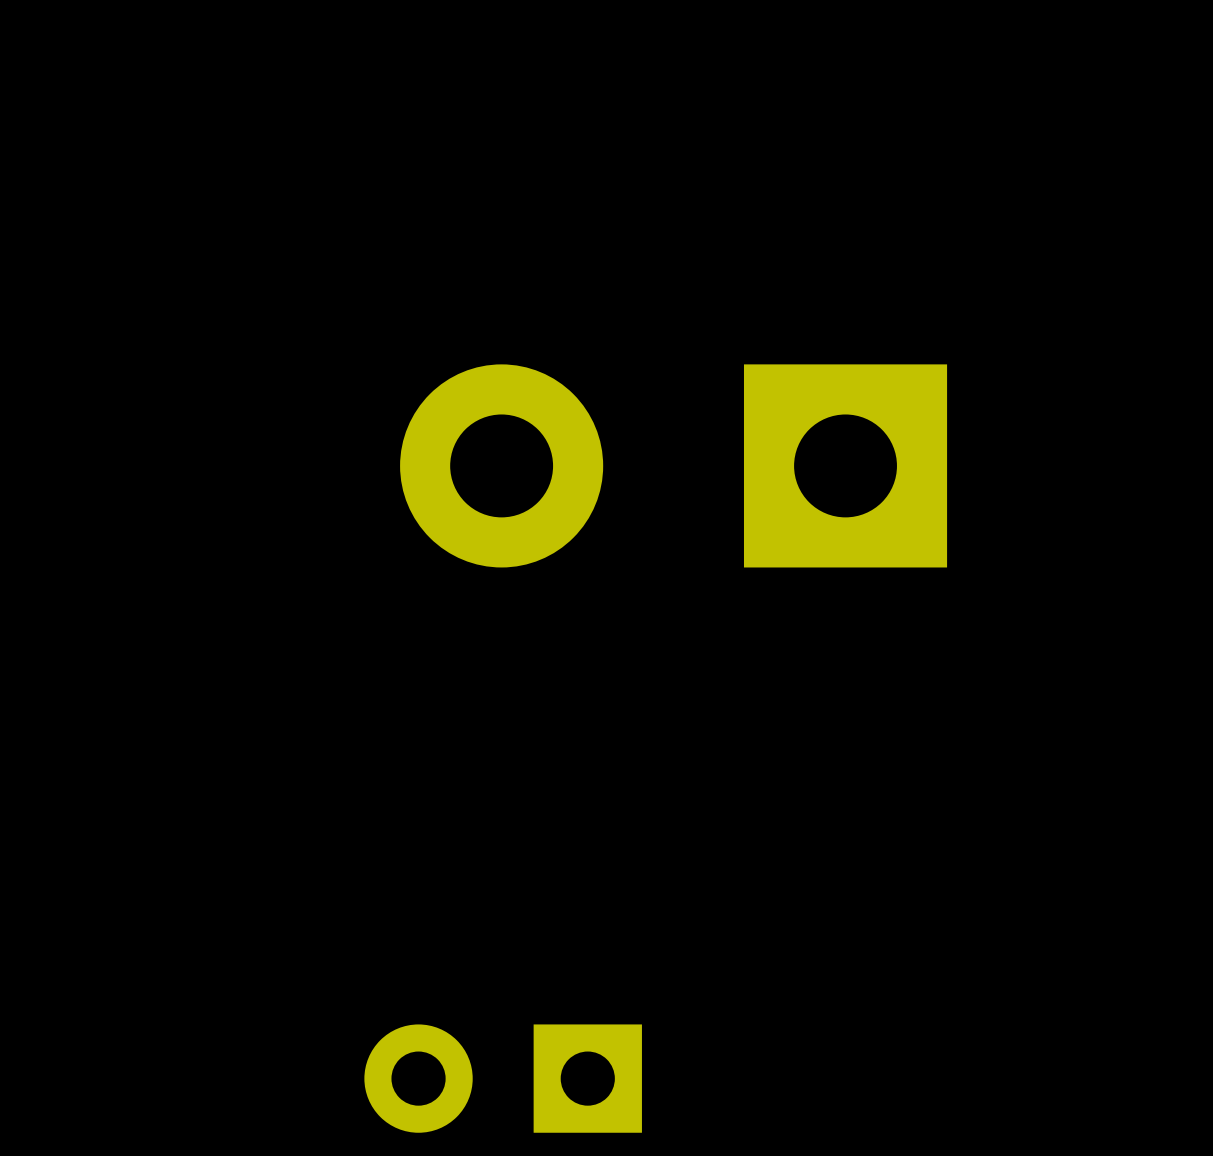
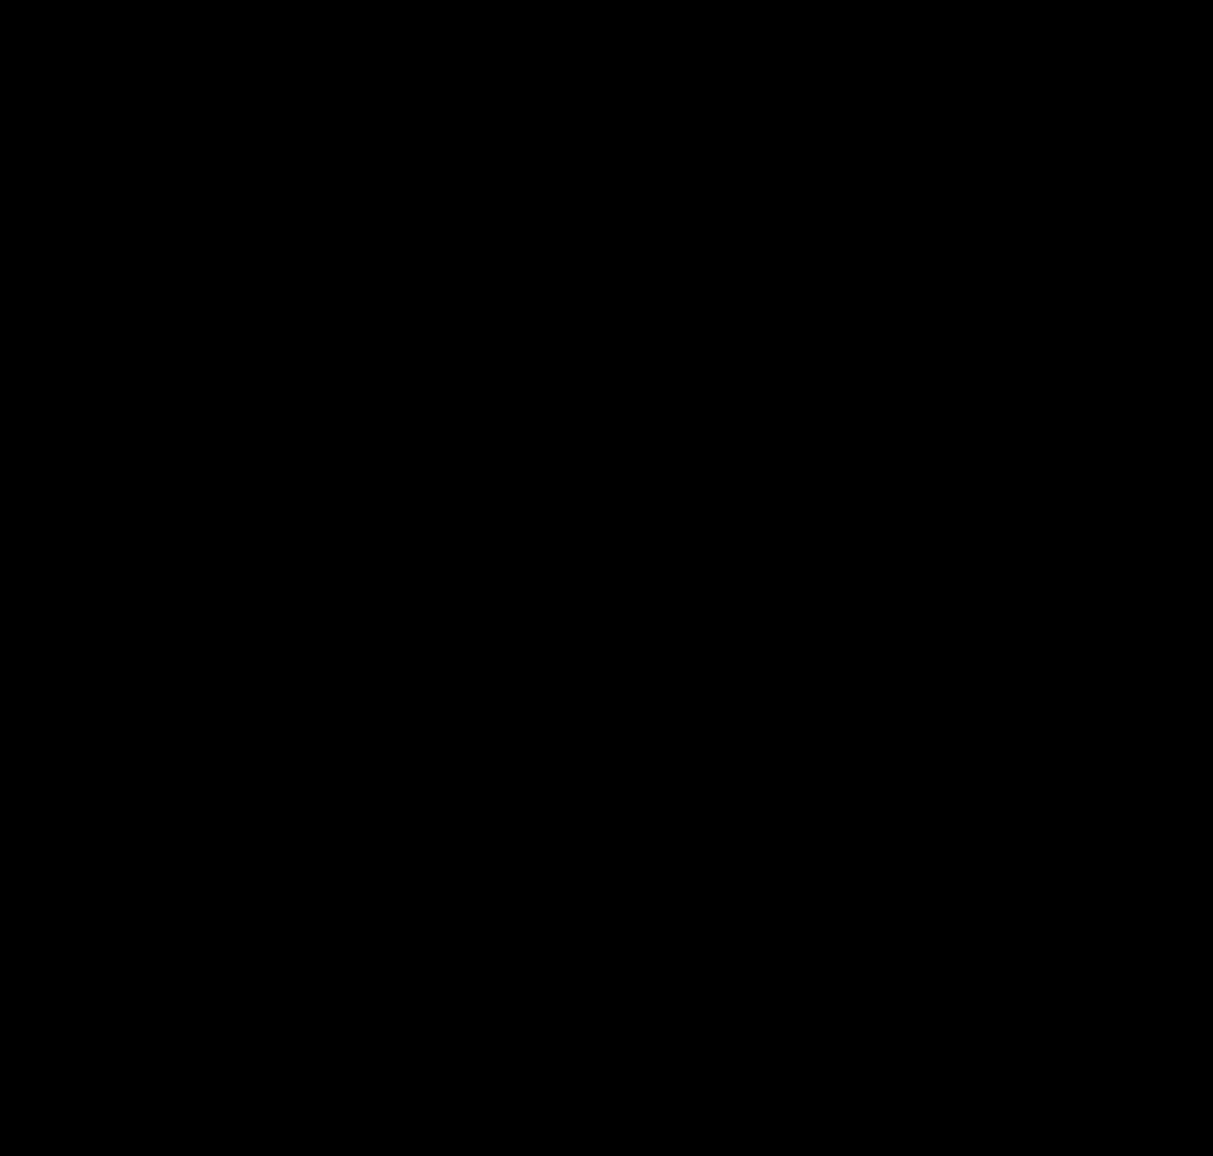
part: (673, 465) -> none
part: (503, 1078) -> none

